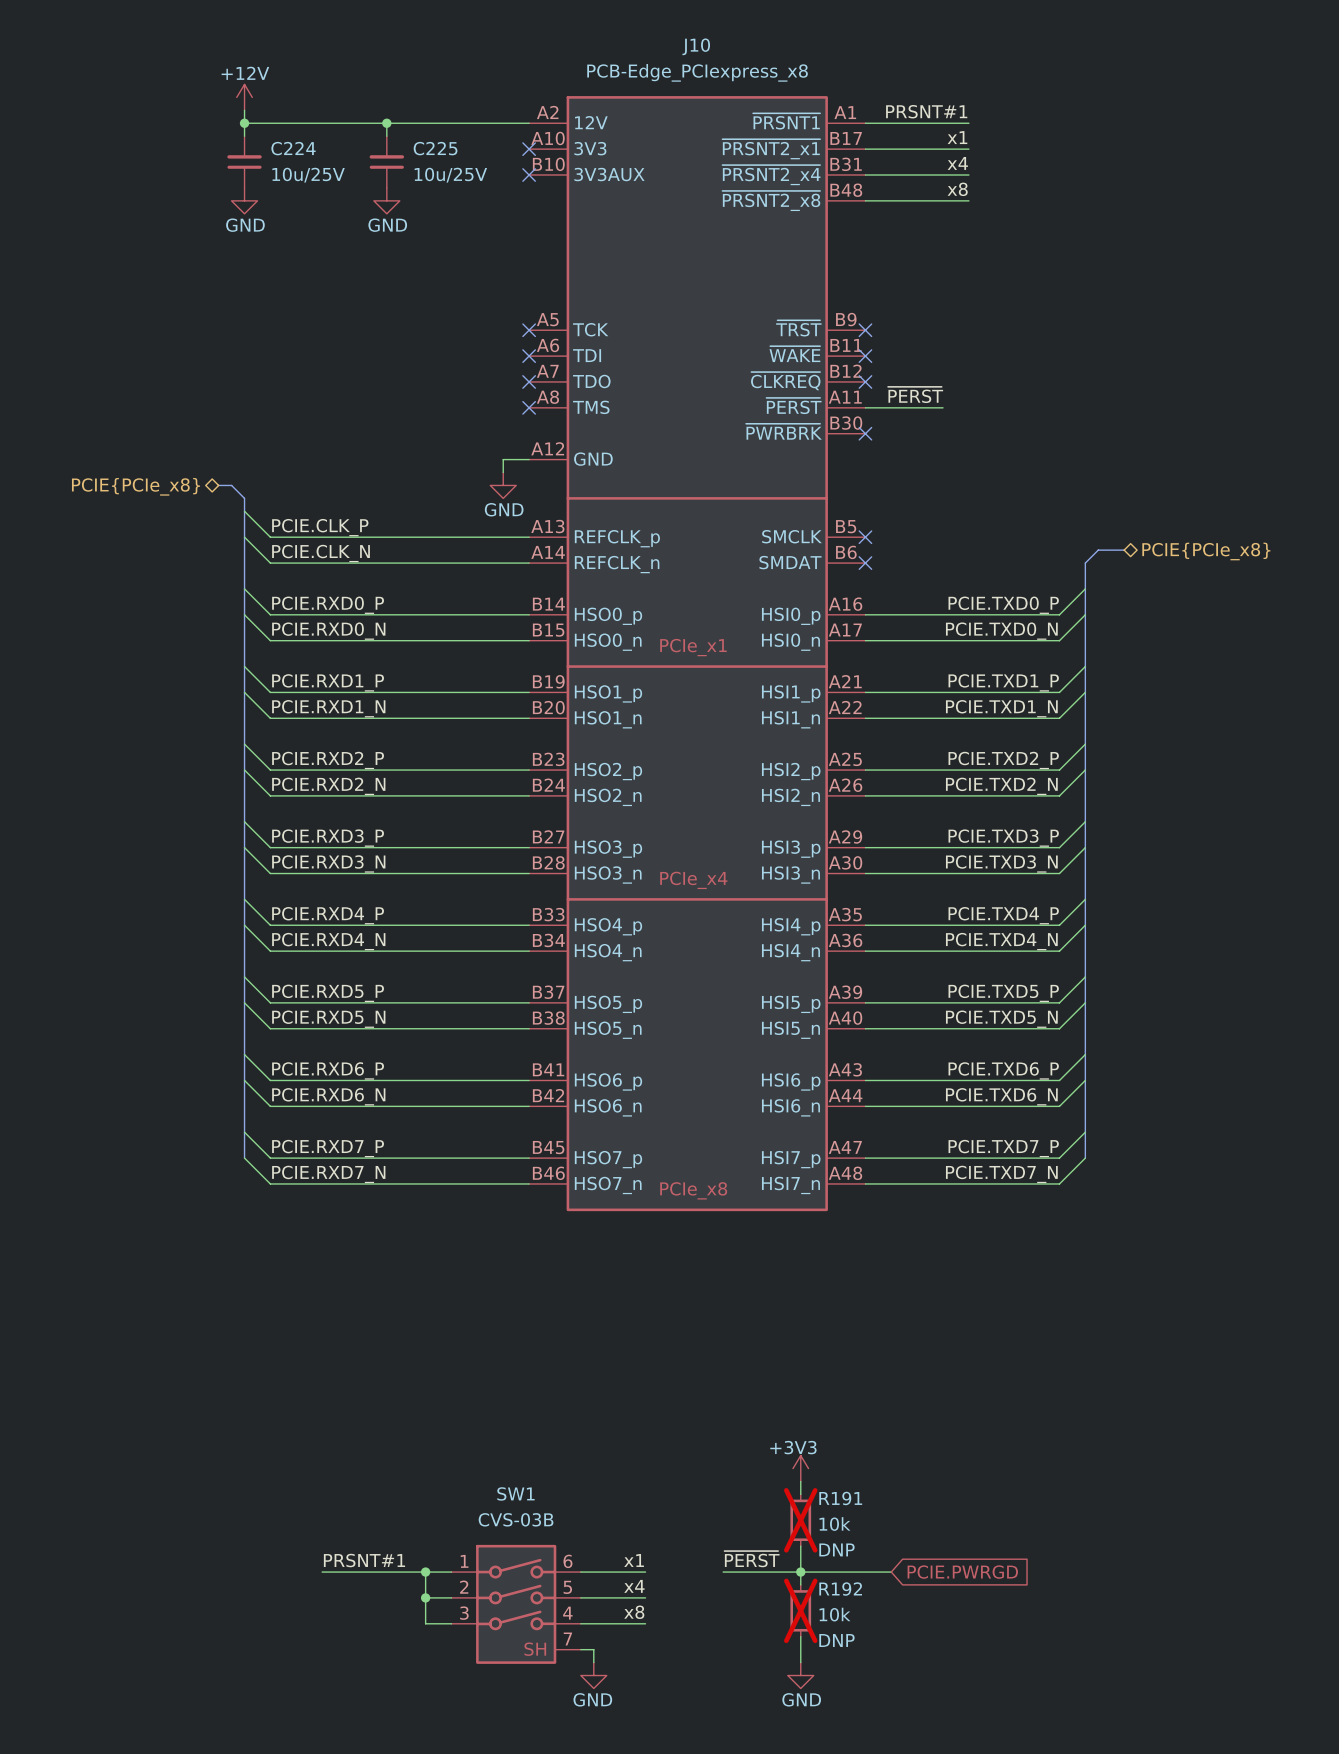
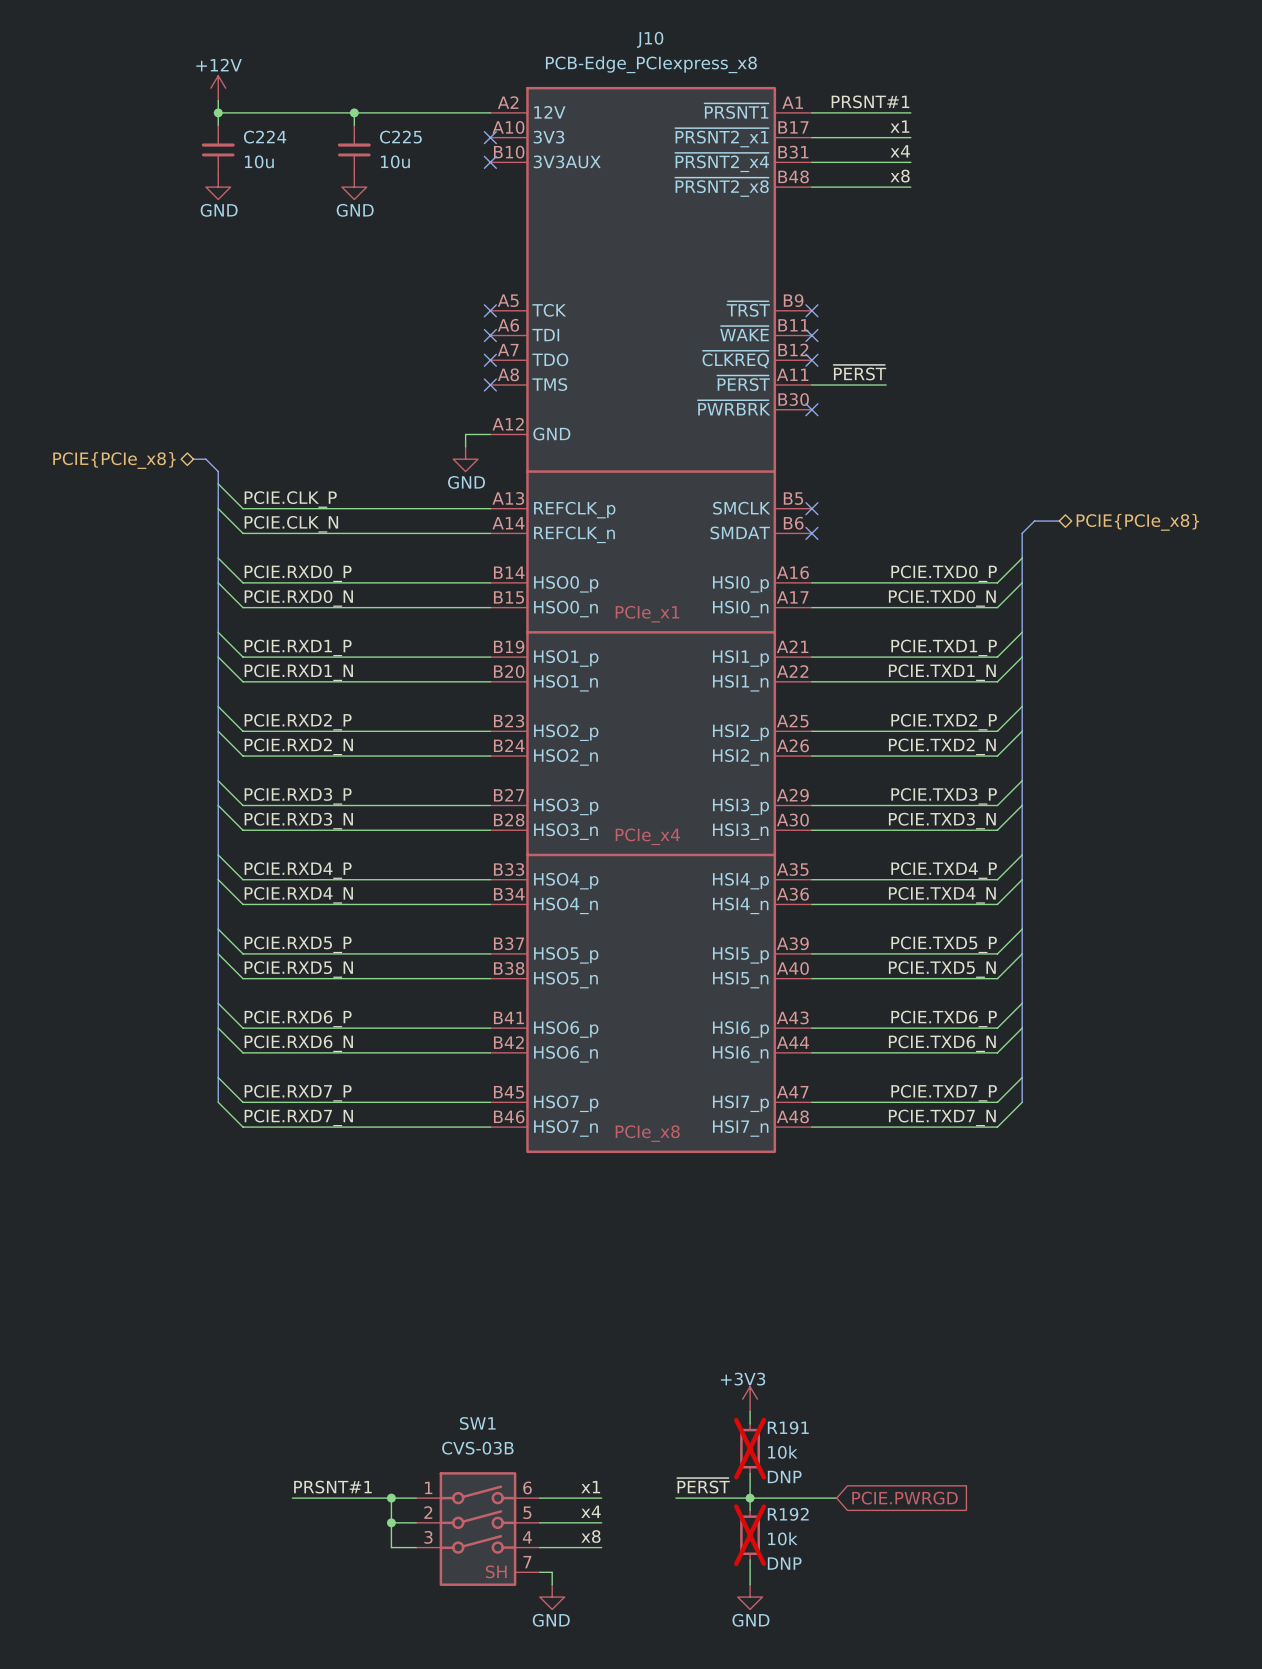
C224 text: 10u/25V (308, 175) -> 10u (259, 161)
C225 text: 10u/25V (450, 175) -> 10u (395, 161)

